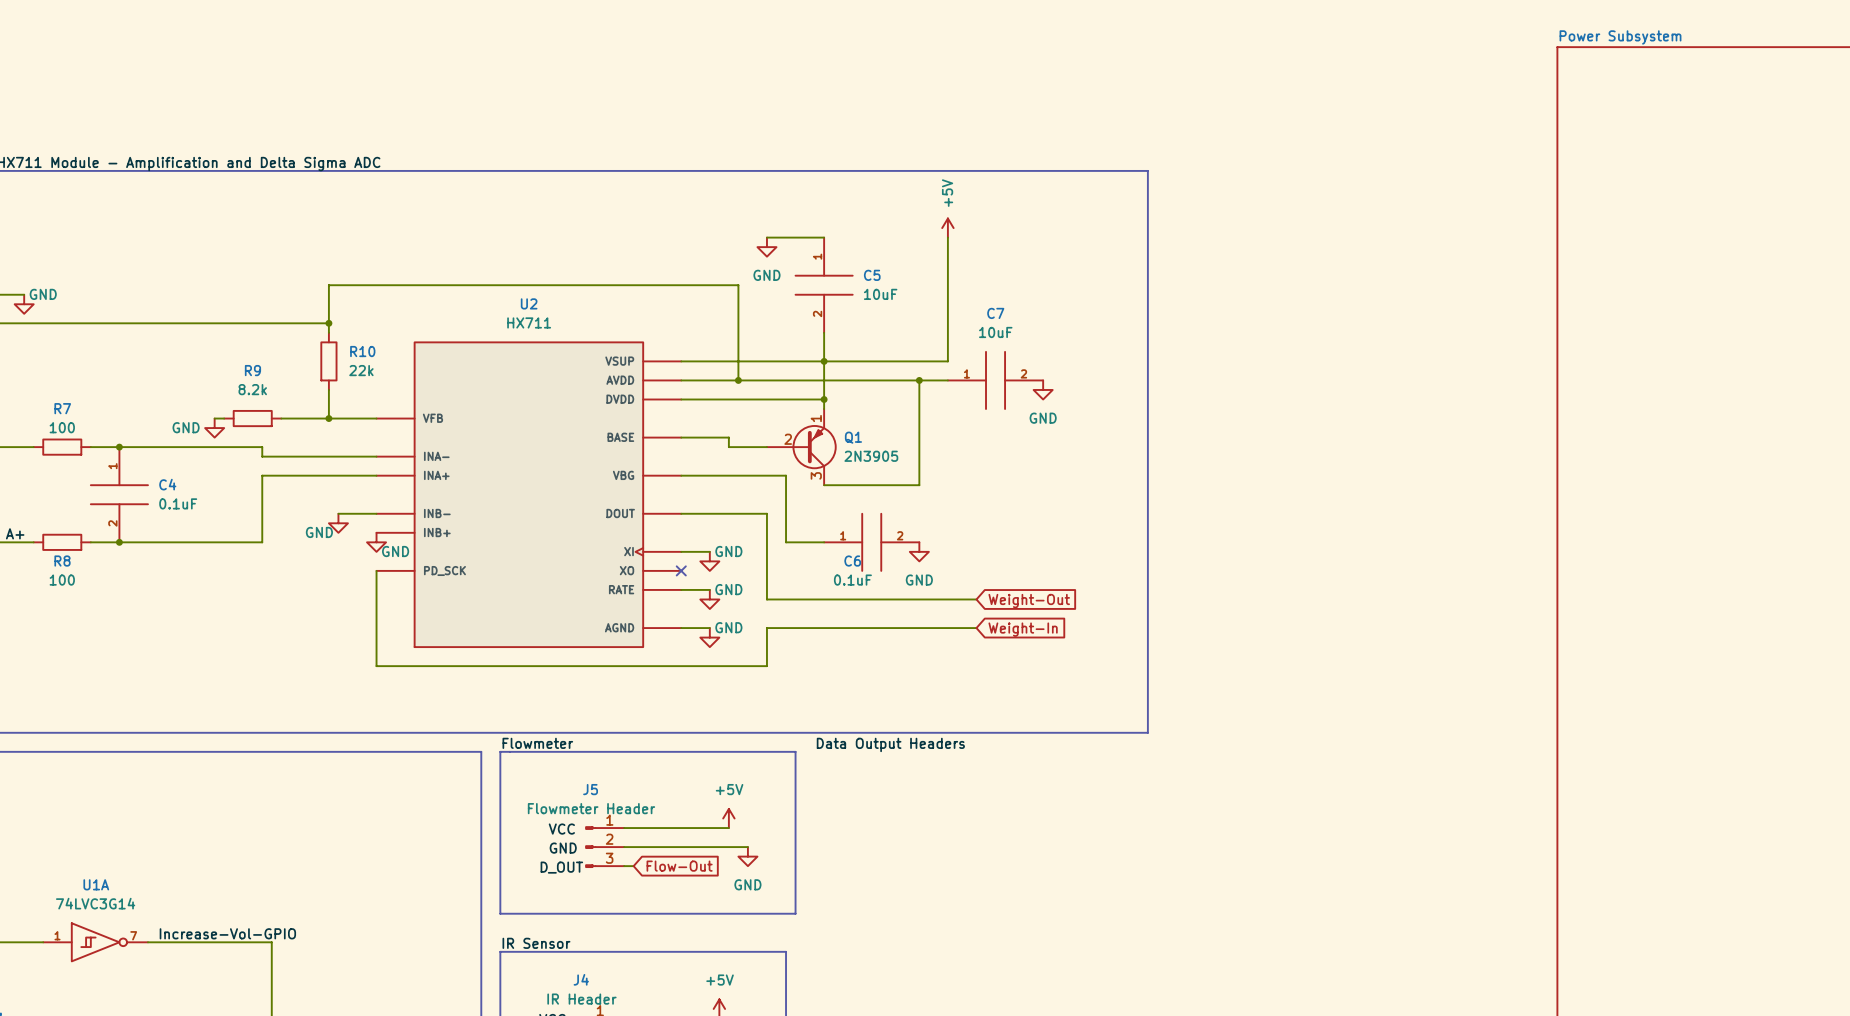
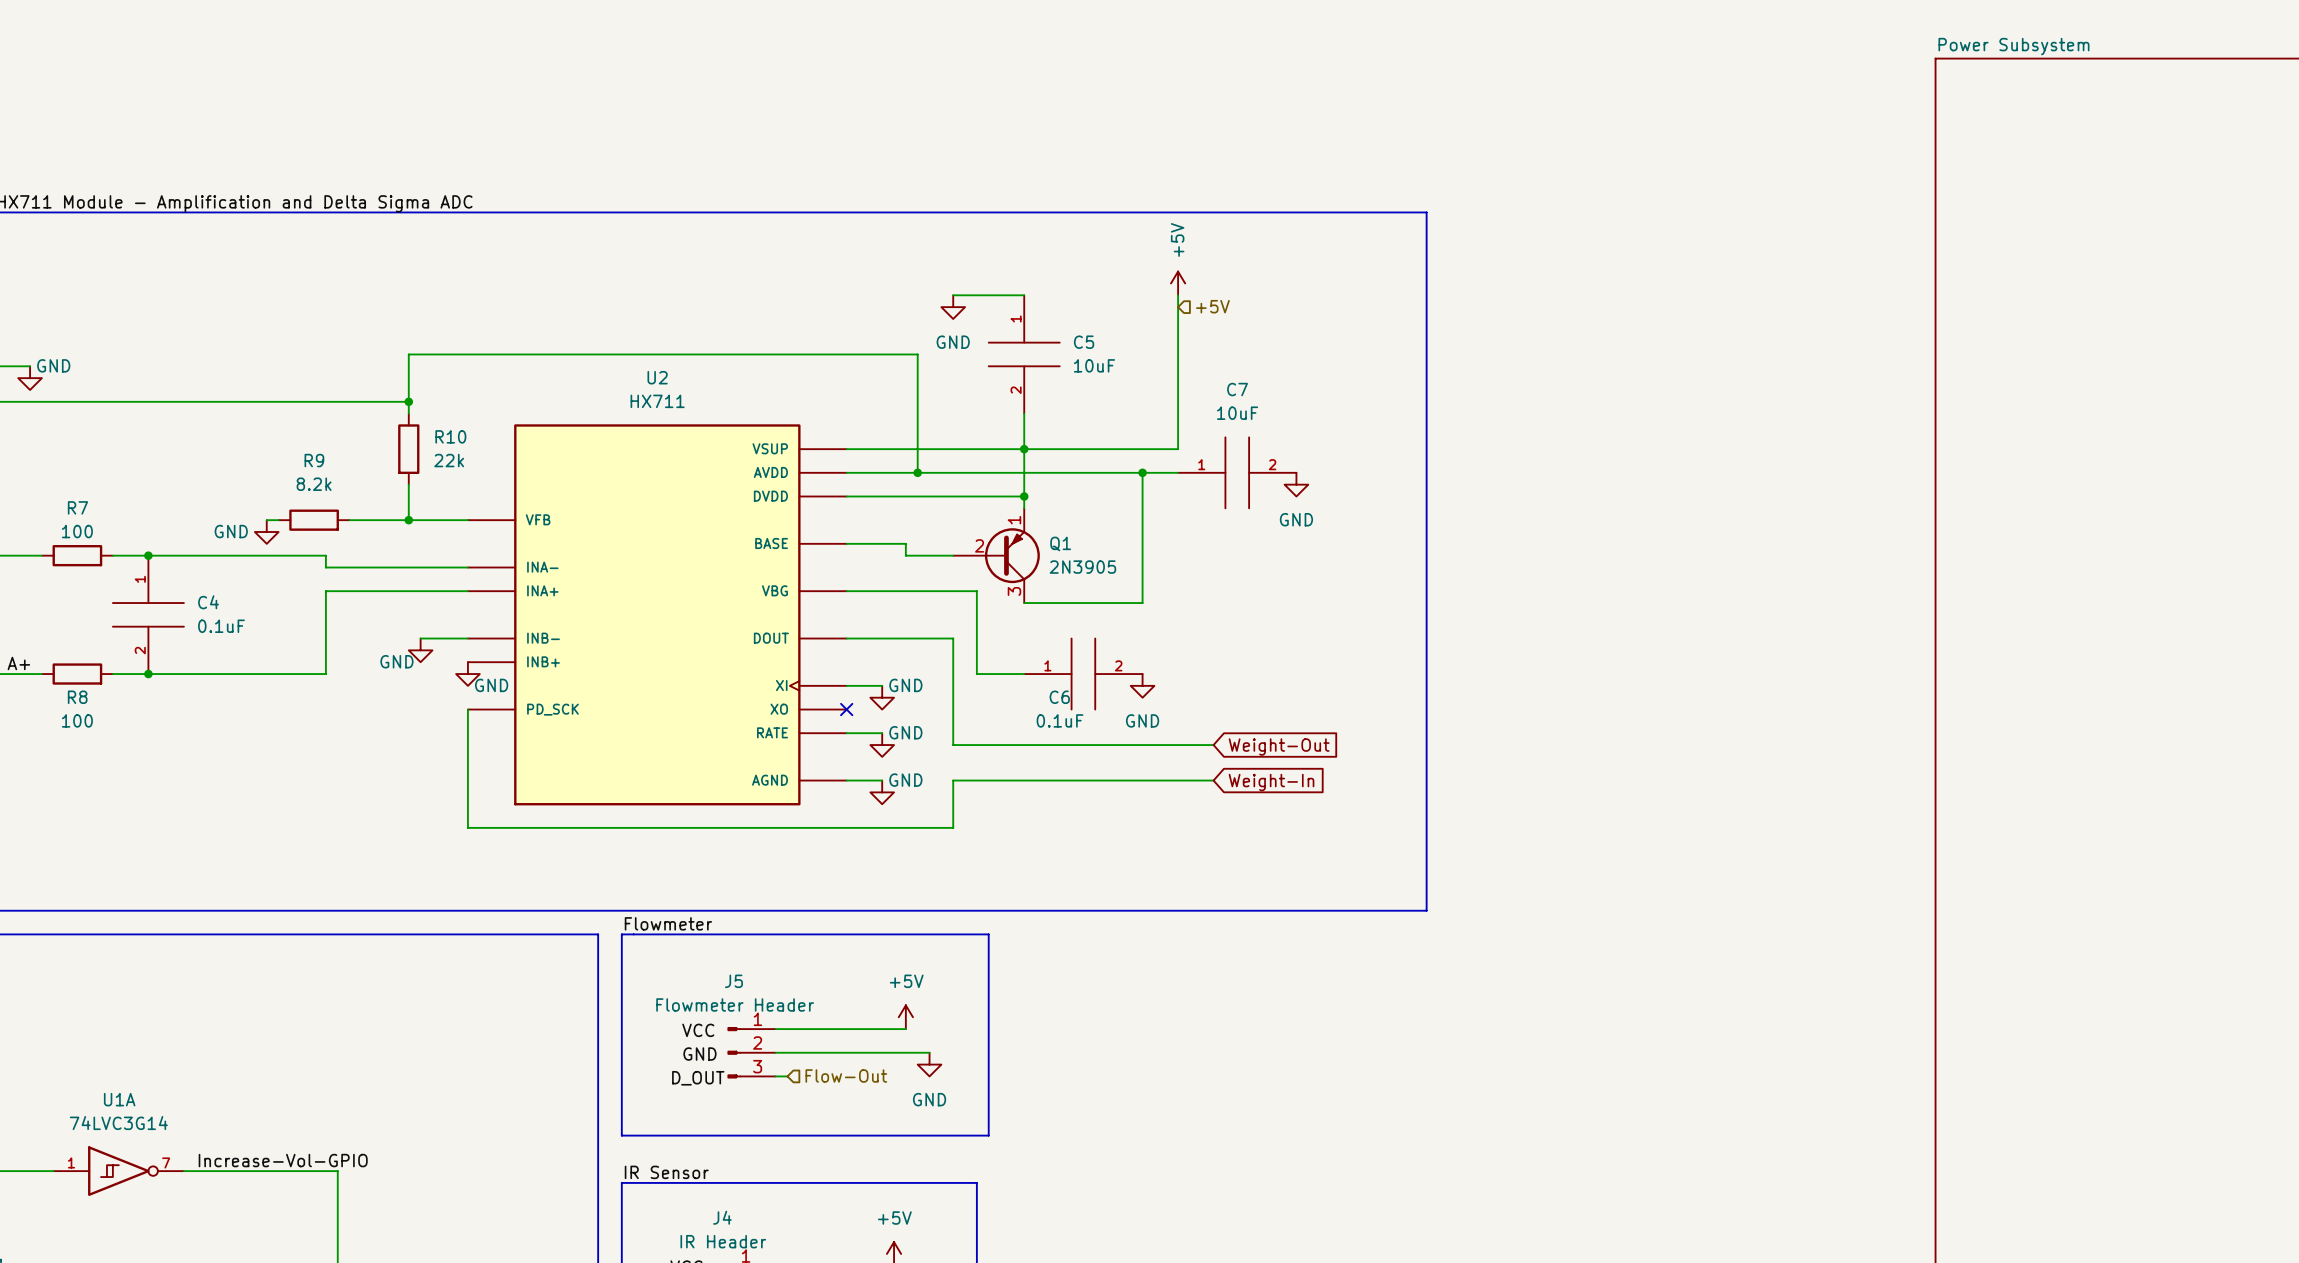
hierarchical label: none -> +5V (1212, 306)
label: Data Output Headers (890, 744) -> none
hierarchical label: none -> Flow-Out (846, 1075)
global label: Flow-Out (679, 866) -> none

